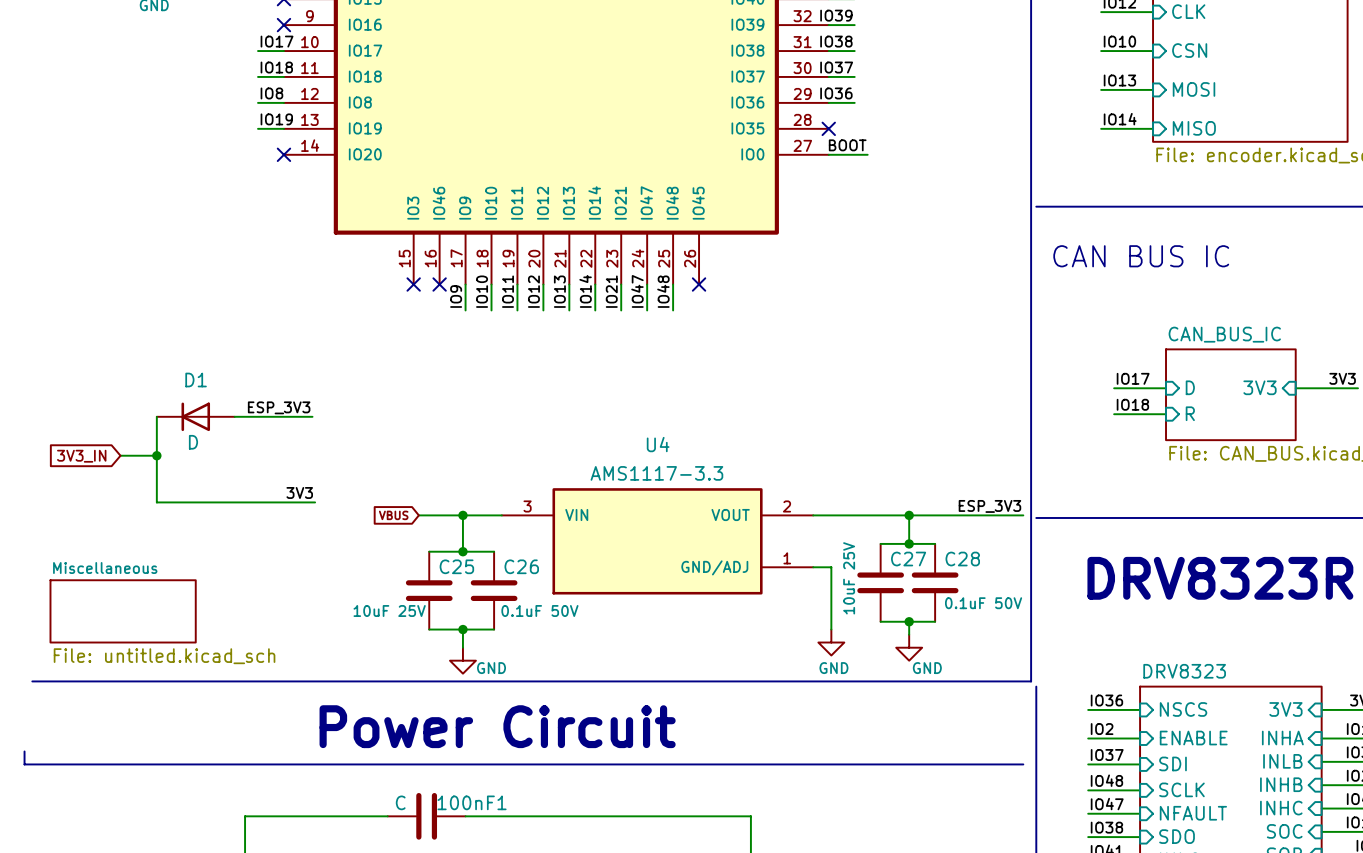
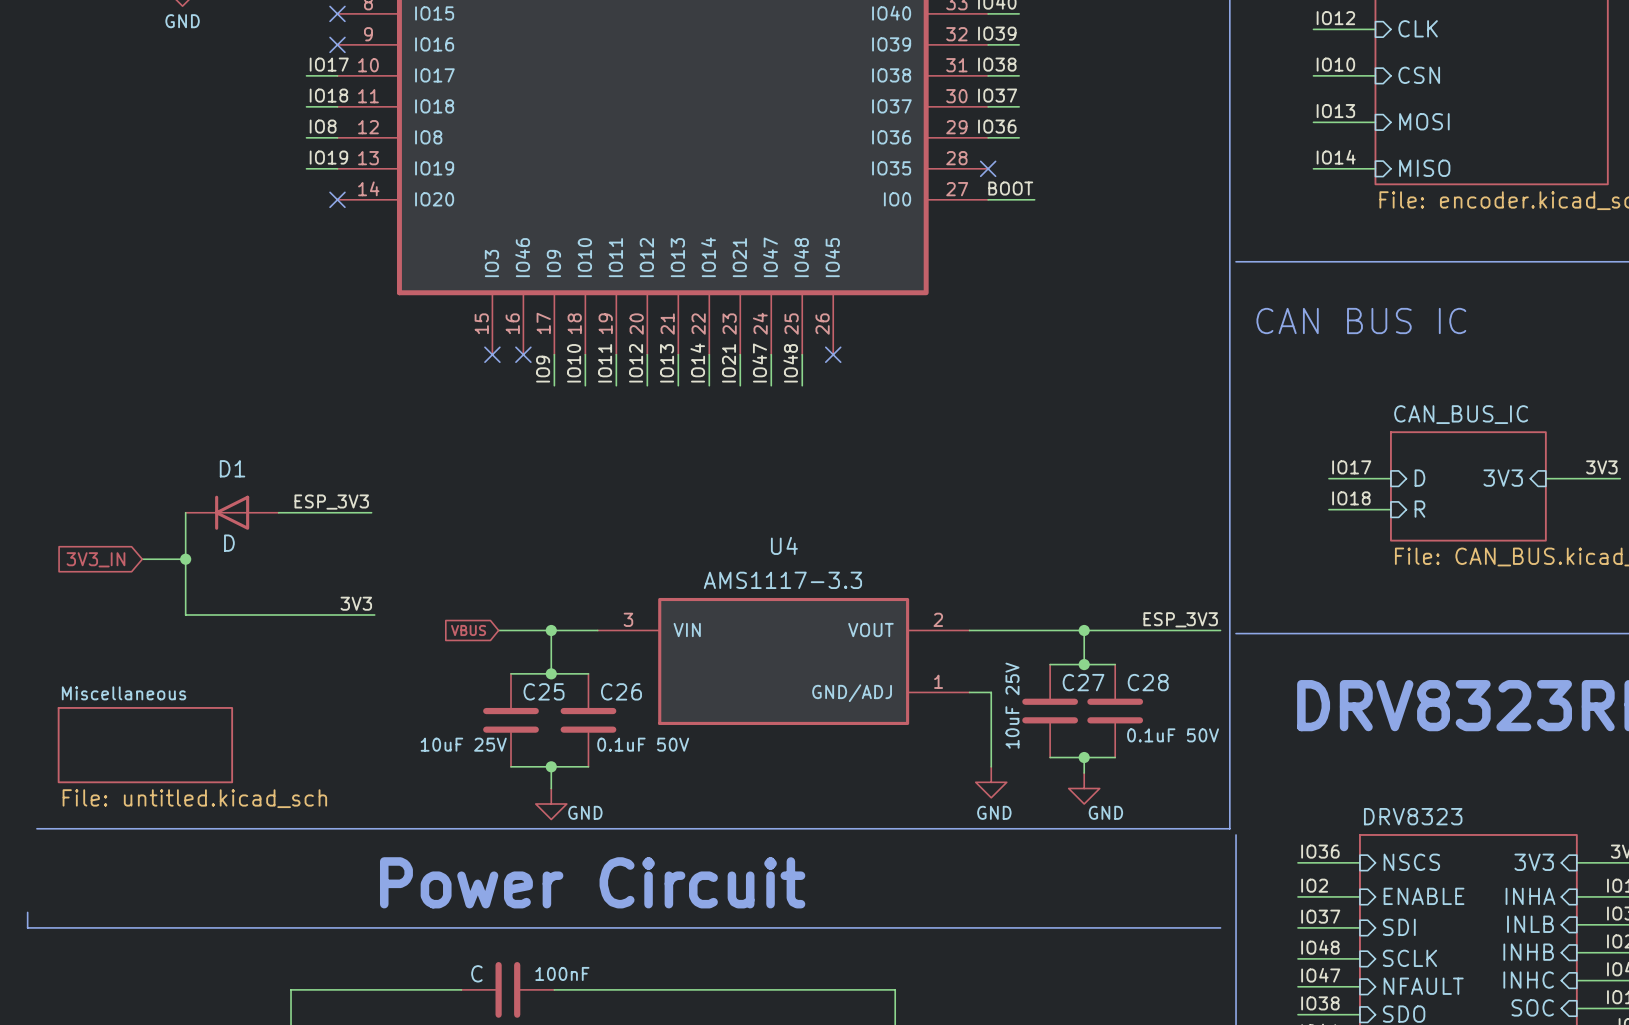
100nF1 name: 100nF1 (472, 802) -> 100nF (562, 973)

